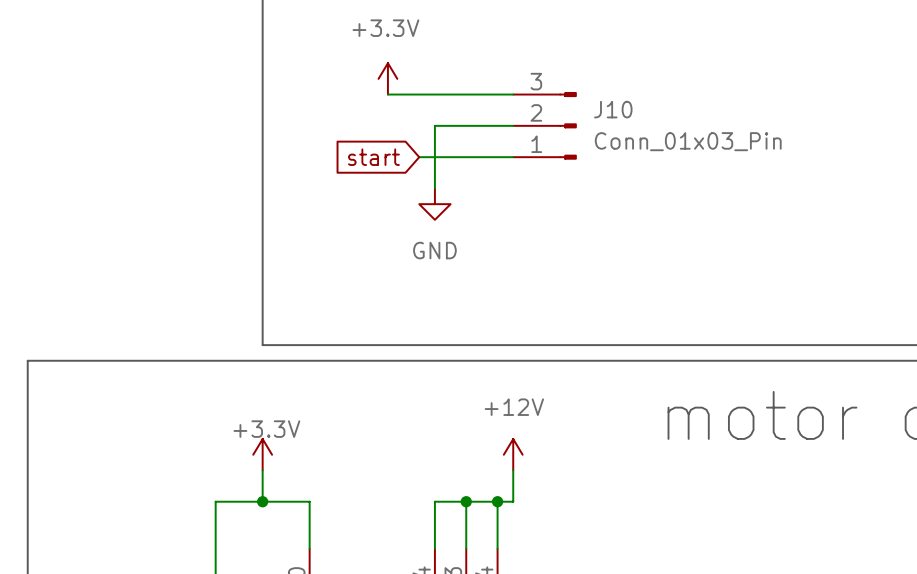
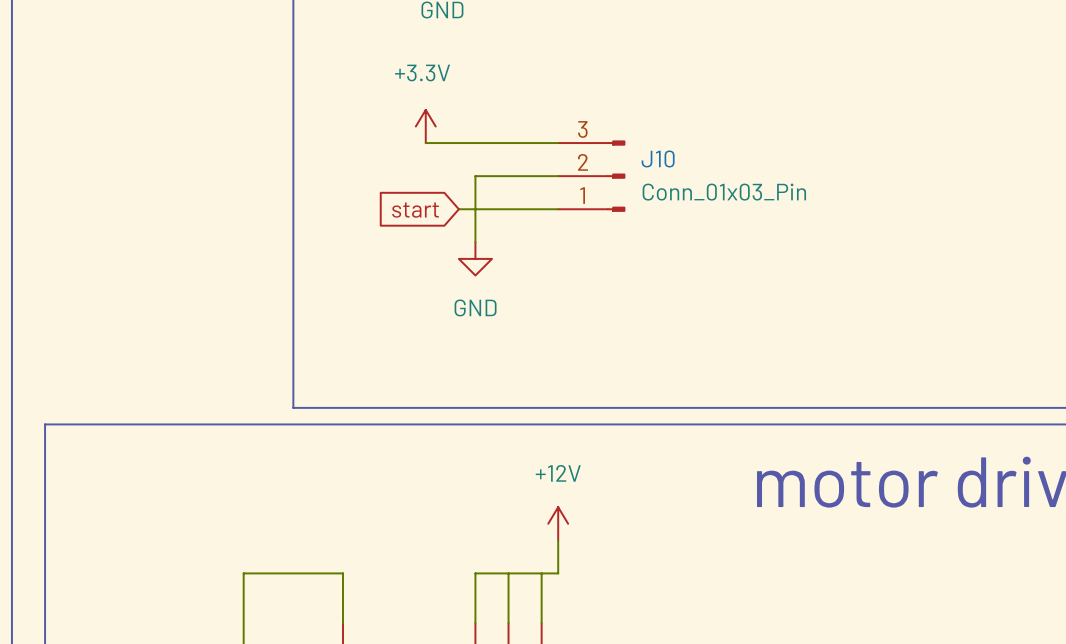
power symbol: +3.3V (262, 454) -> none
wire: (262, 470) (262, 501) -> none
junction: (262, 501) -> none
junction: (466, 501) -> none
junction: (497, 501) -> none

